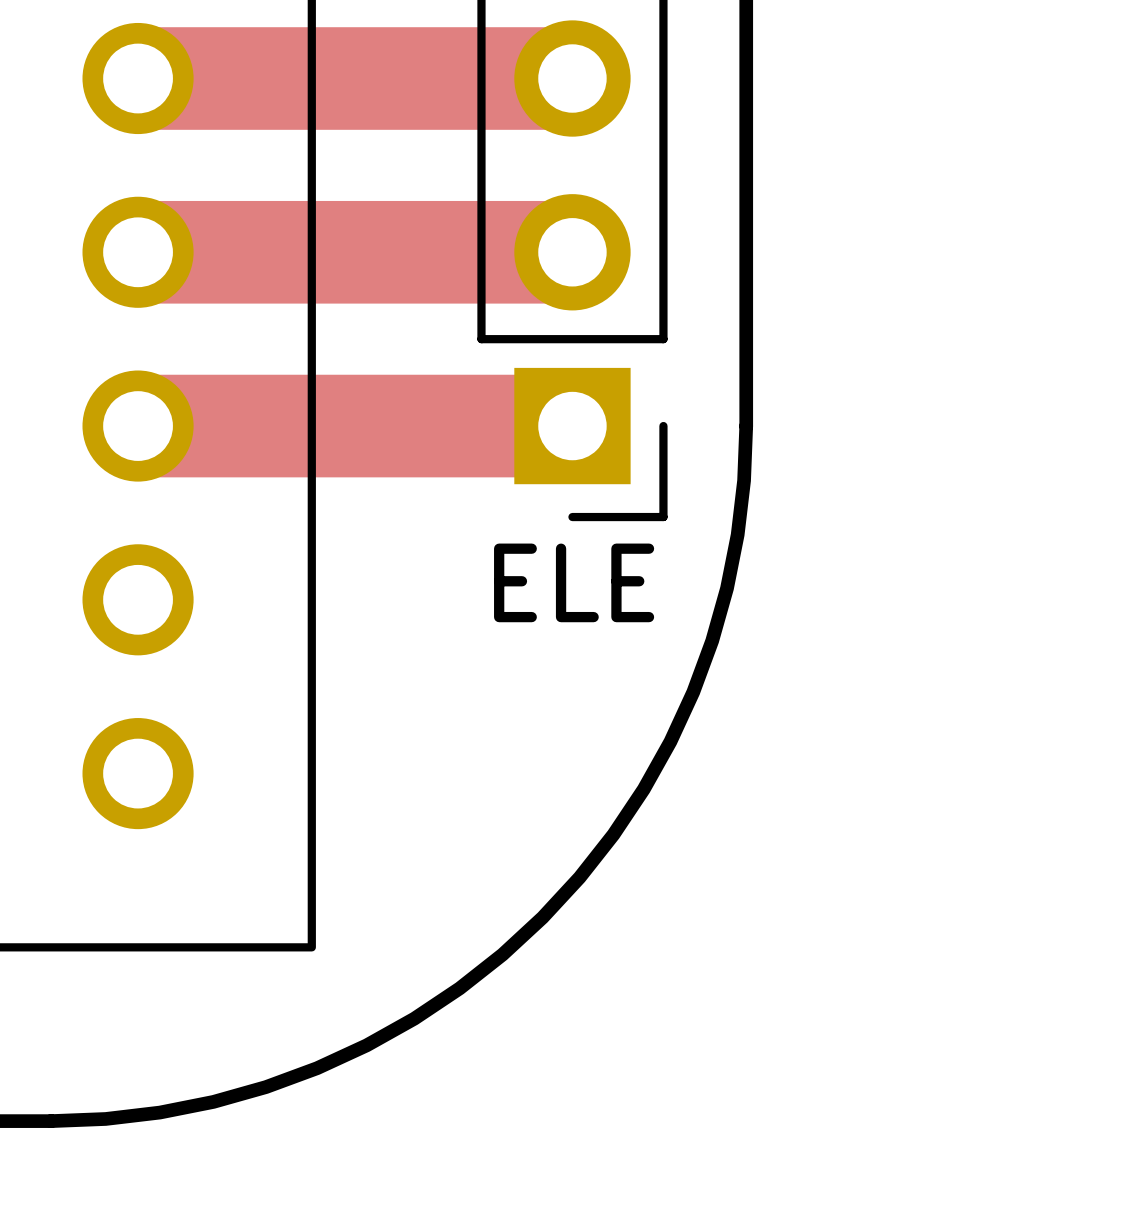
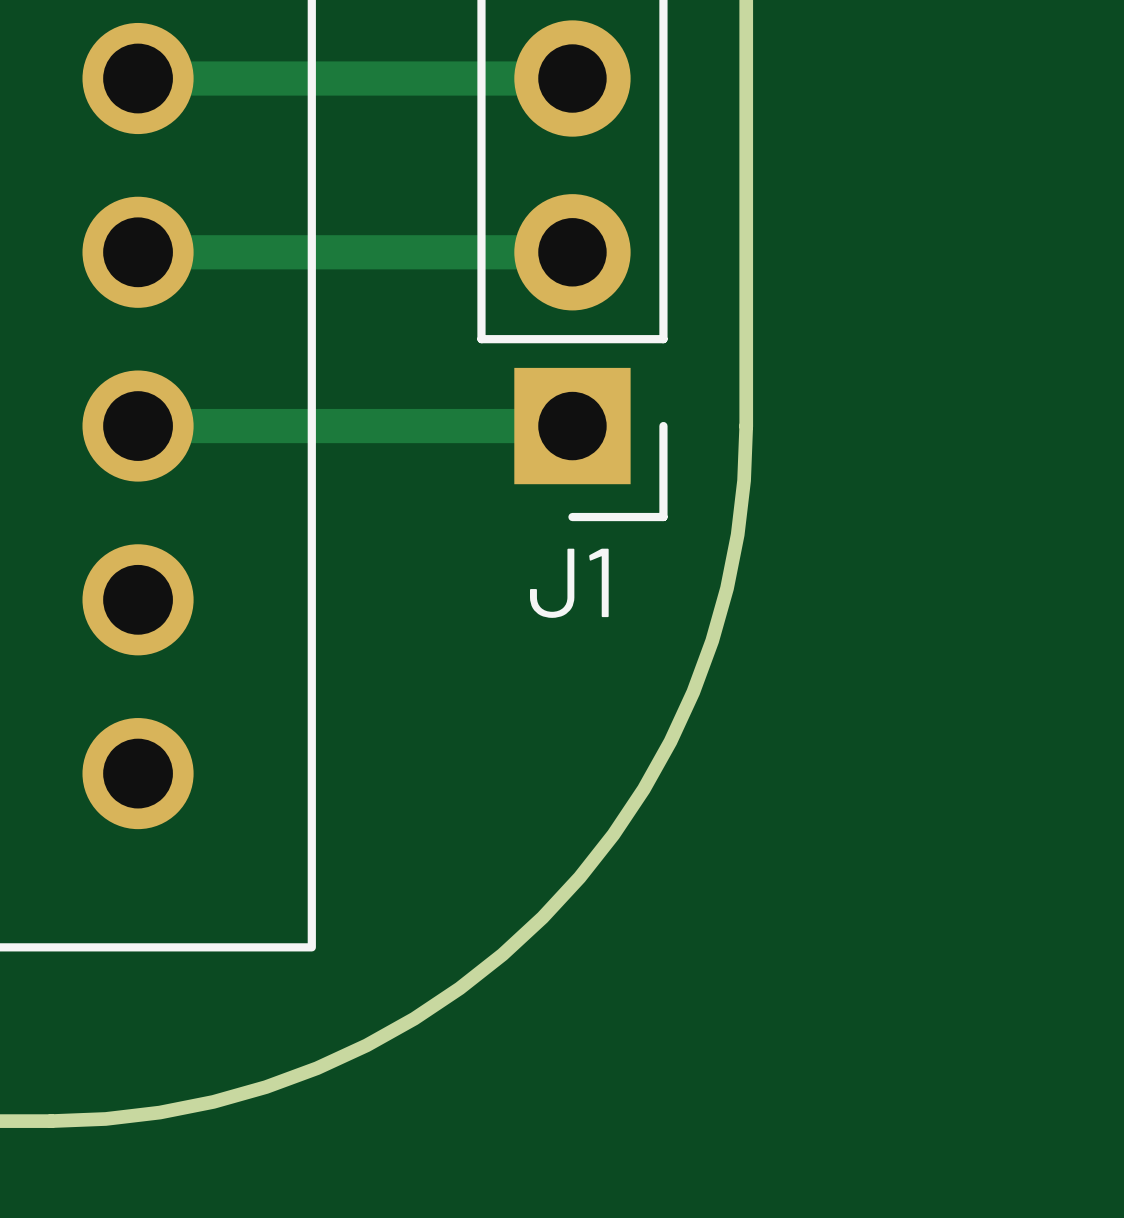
track width: thick (138, 78) (572, 78) -> thin (138, 78) (572, 78)
track width: thick (138, 252) (572, 252) -> thin (138, 252) (572, 252)
track width: thick (138, 426) (572, 426) -> thin (138, 426) (572, 426)
ELE name: ELE (574, 582) -> J1 (569, 583)

